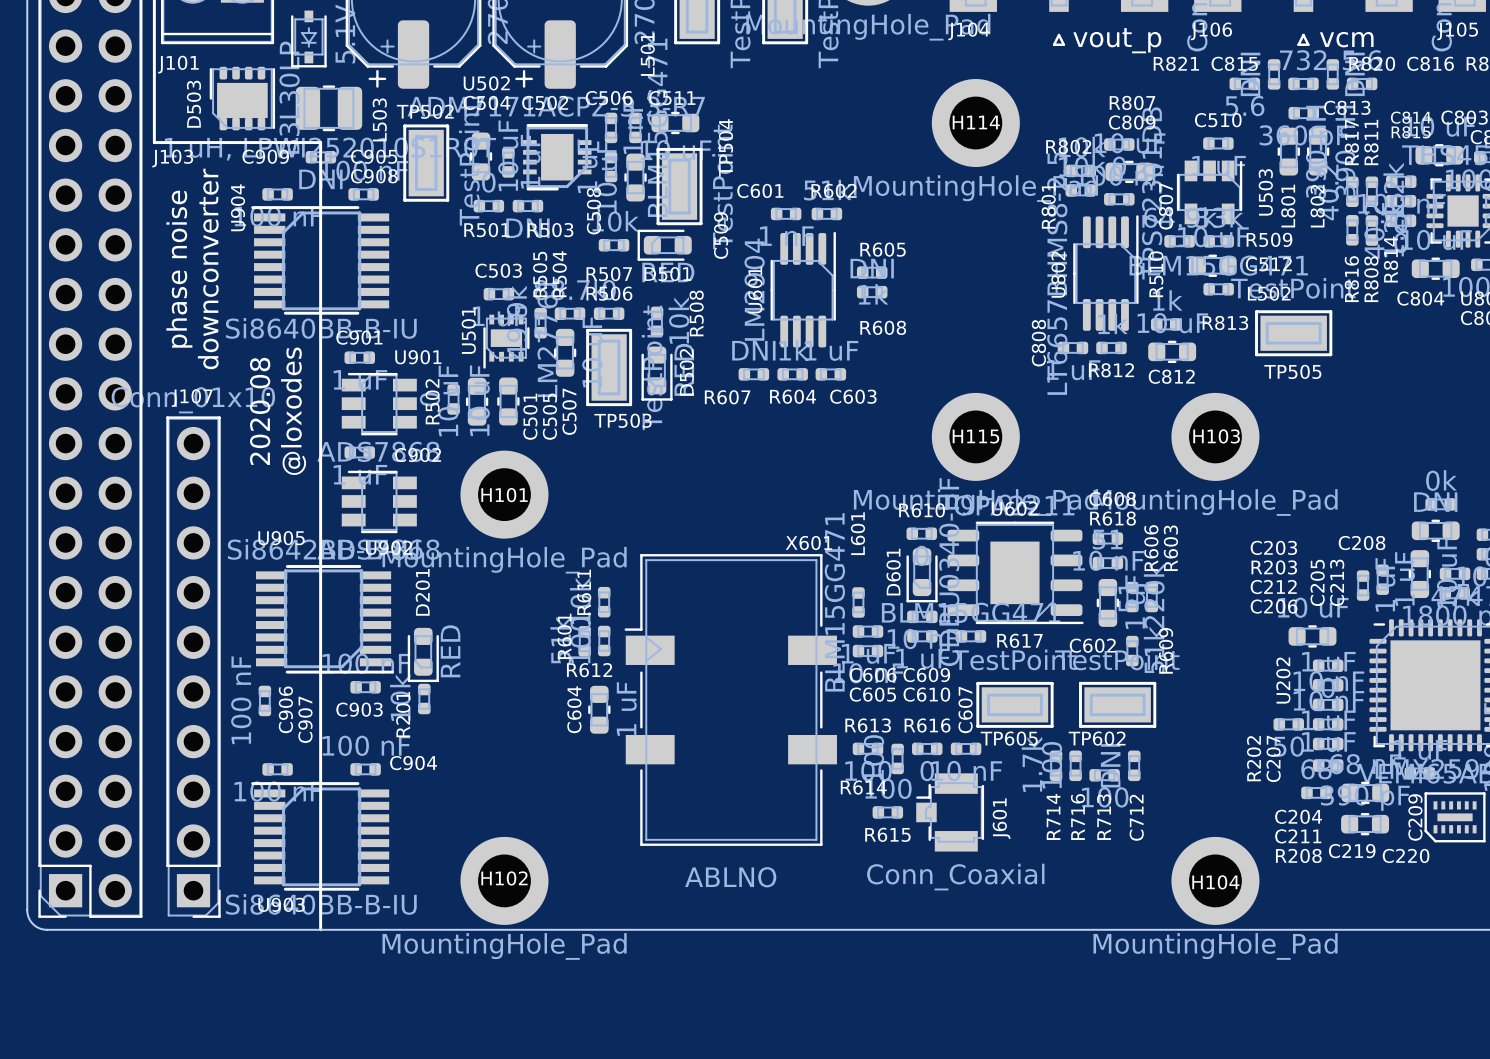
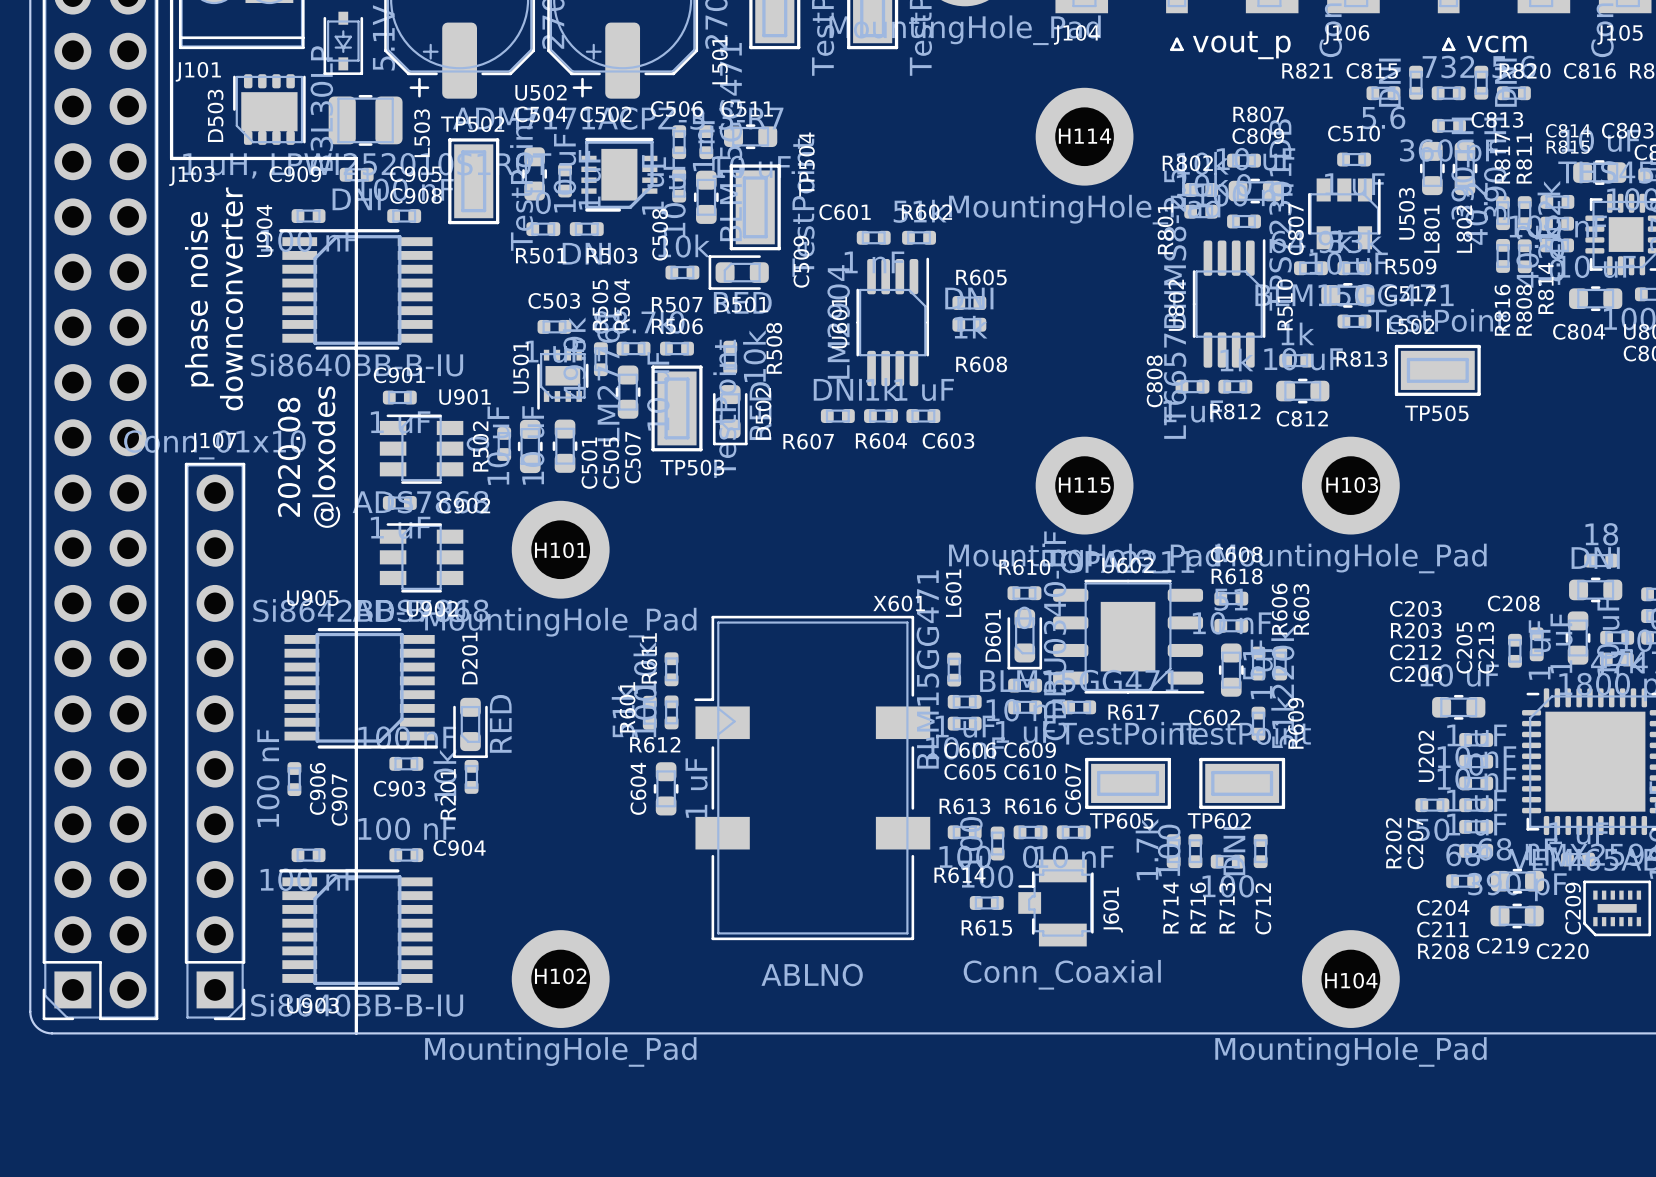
part value: 0k (1441, 480) -> 18 (1601, 534)

